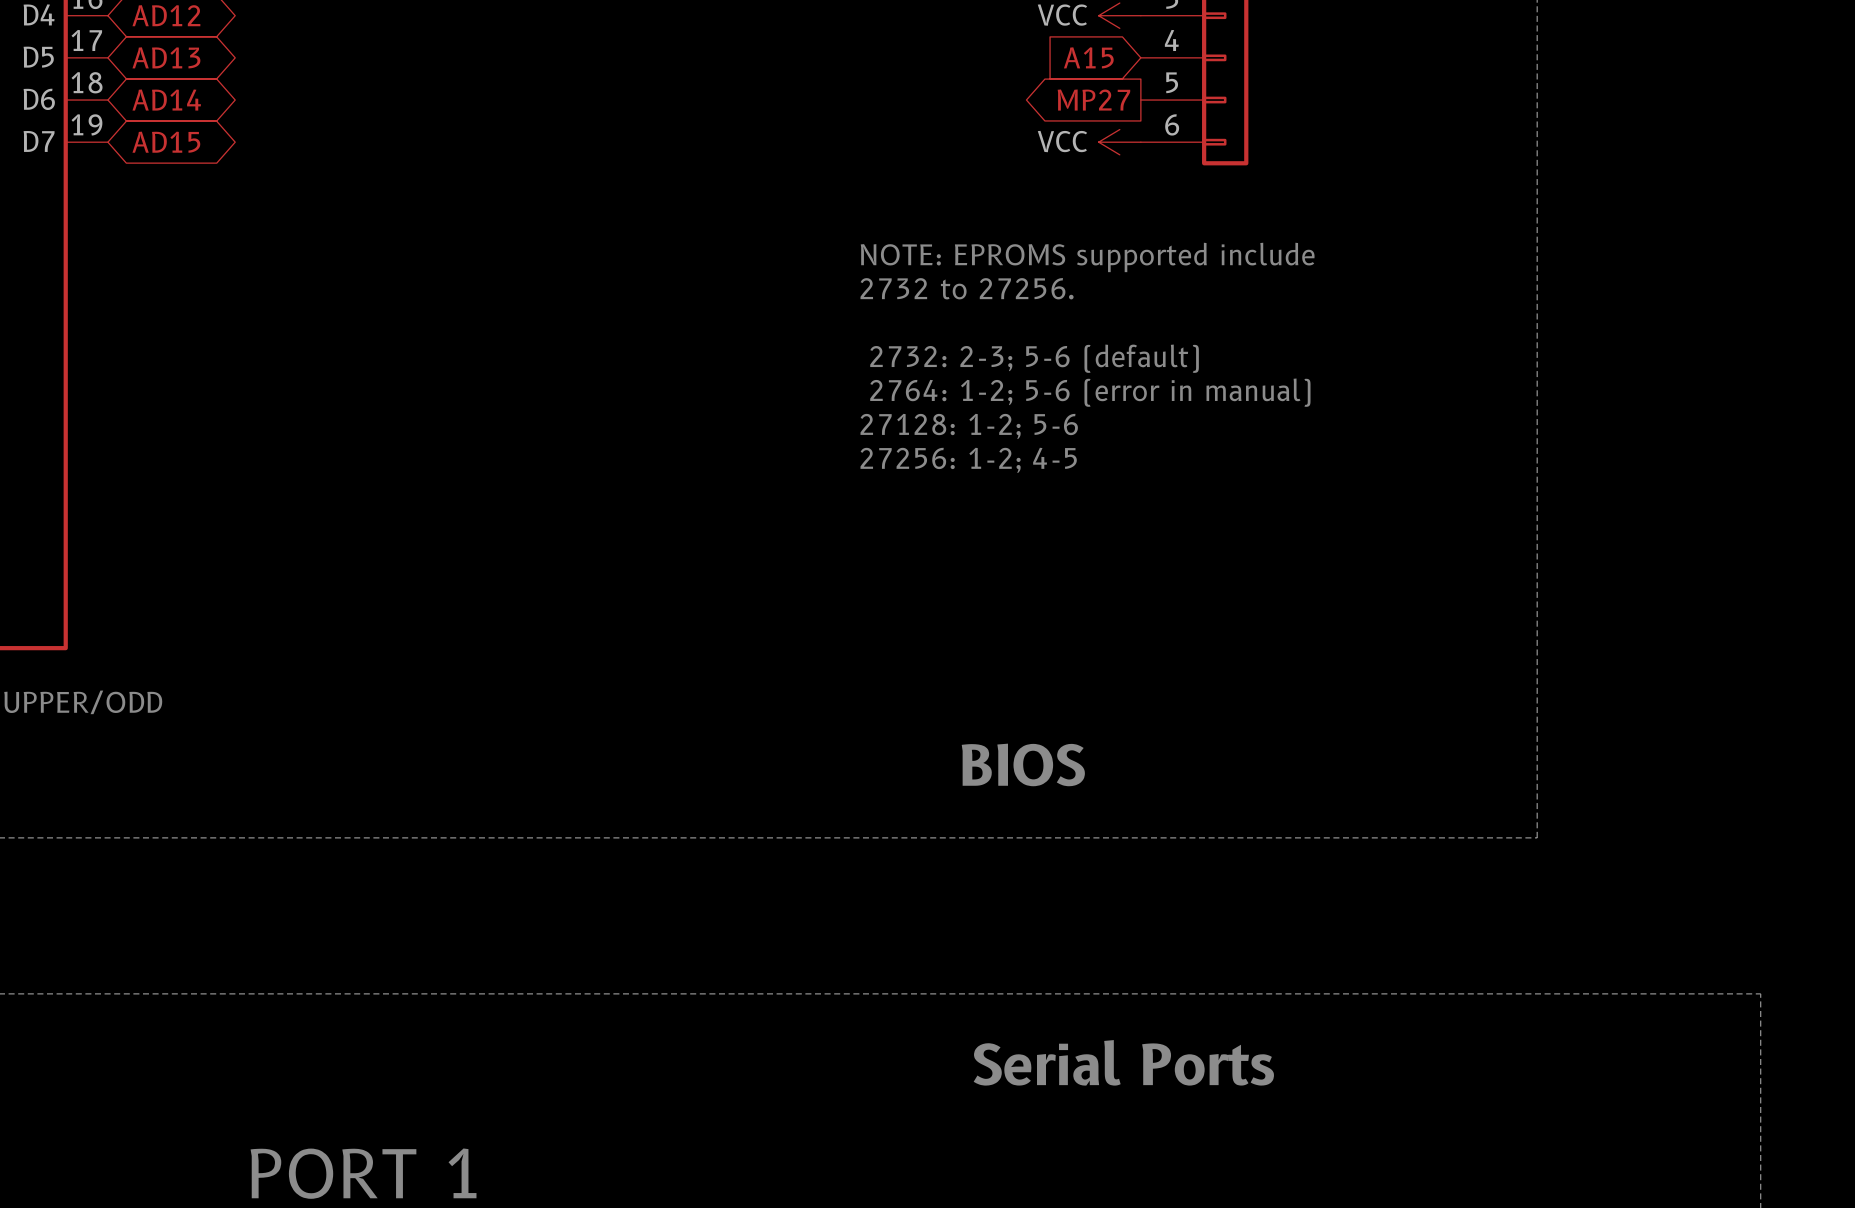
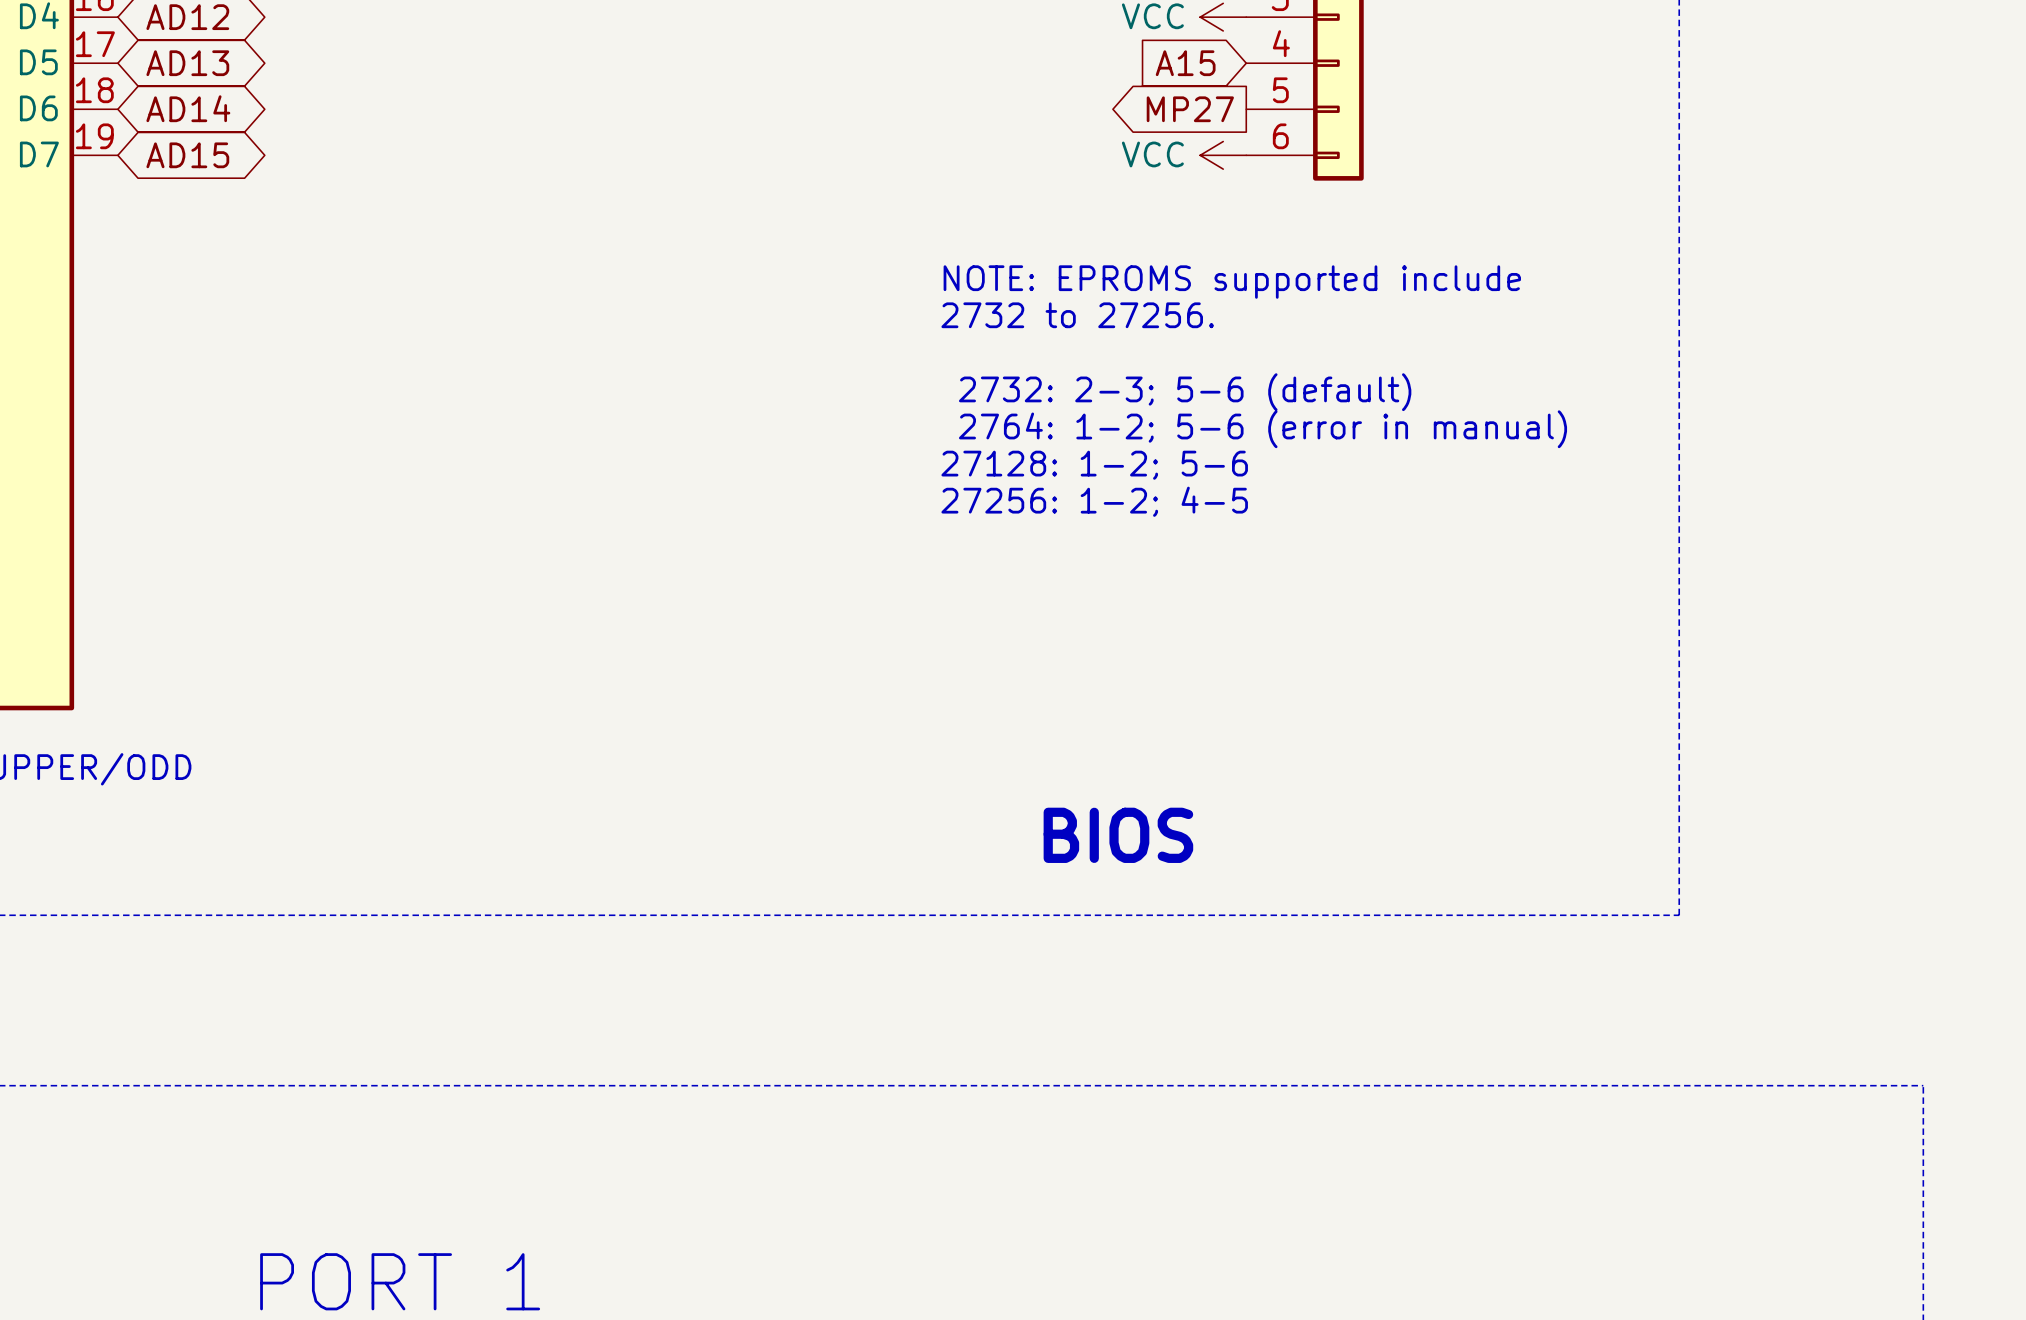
text: Serial Ports (1123, 1062) -> none

